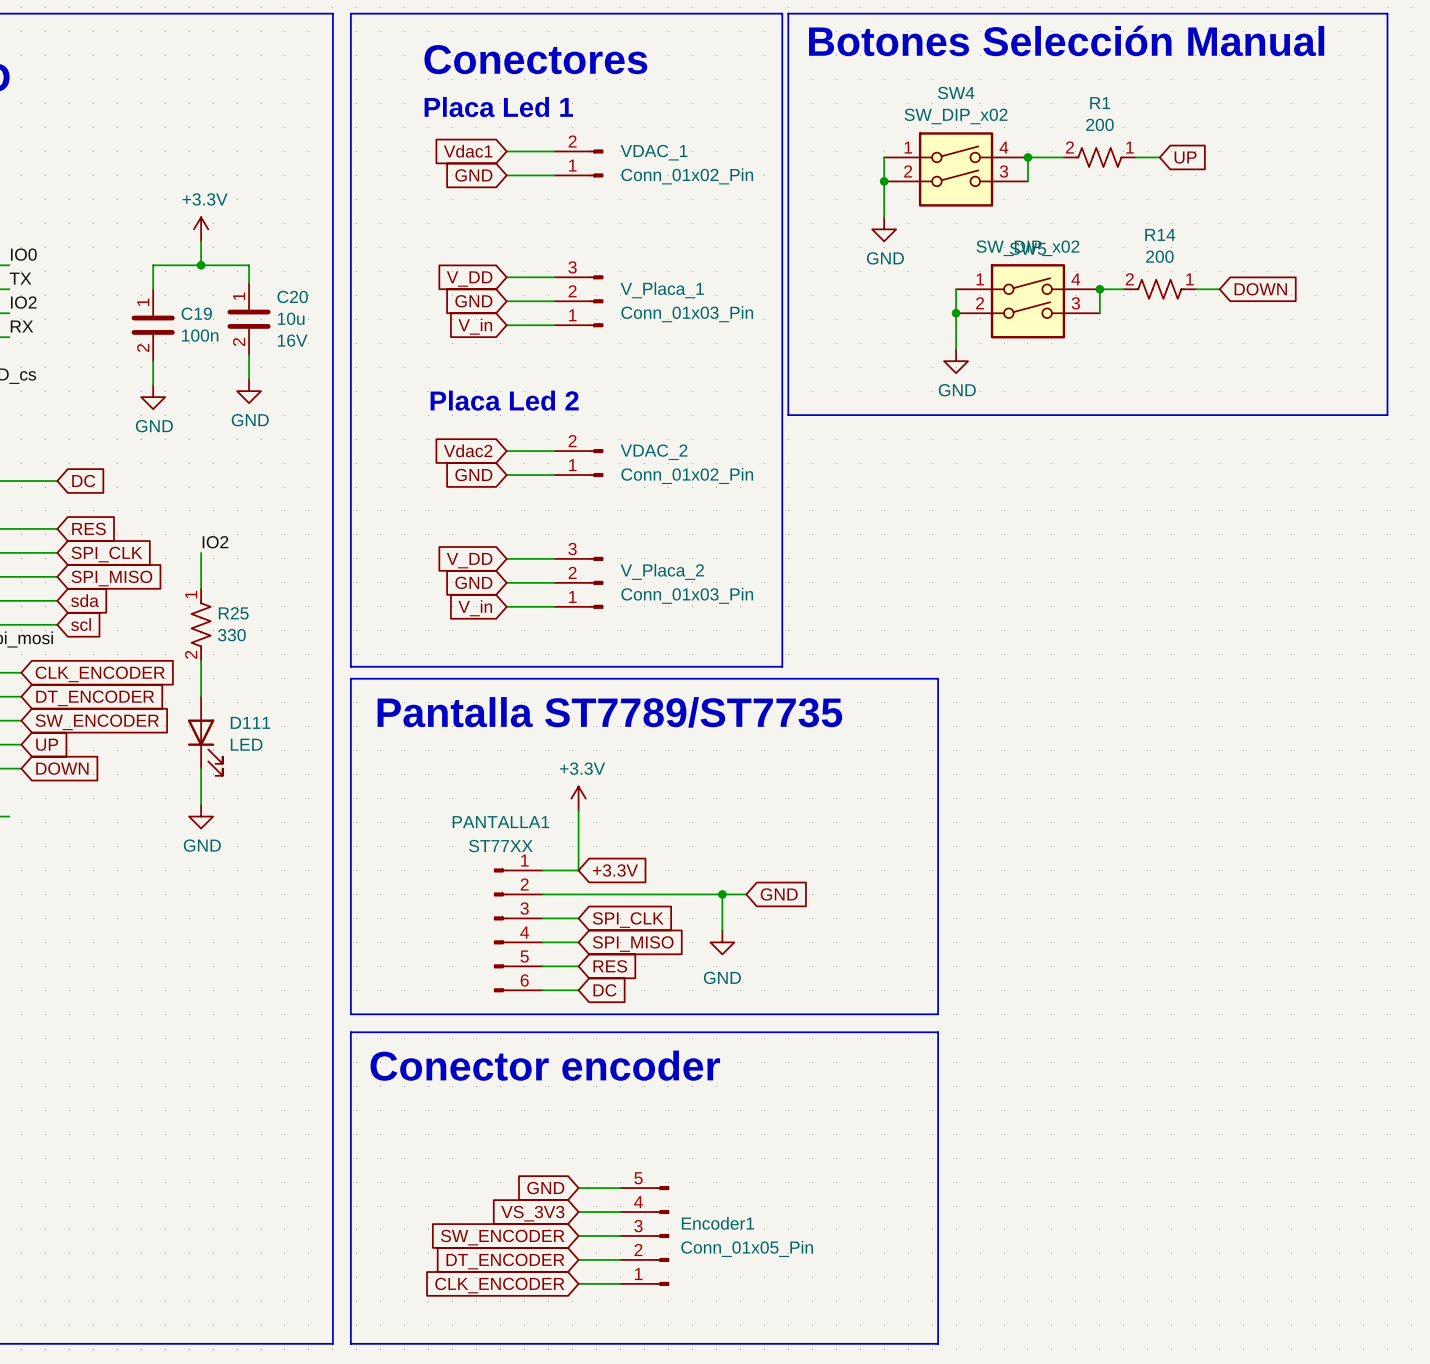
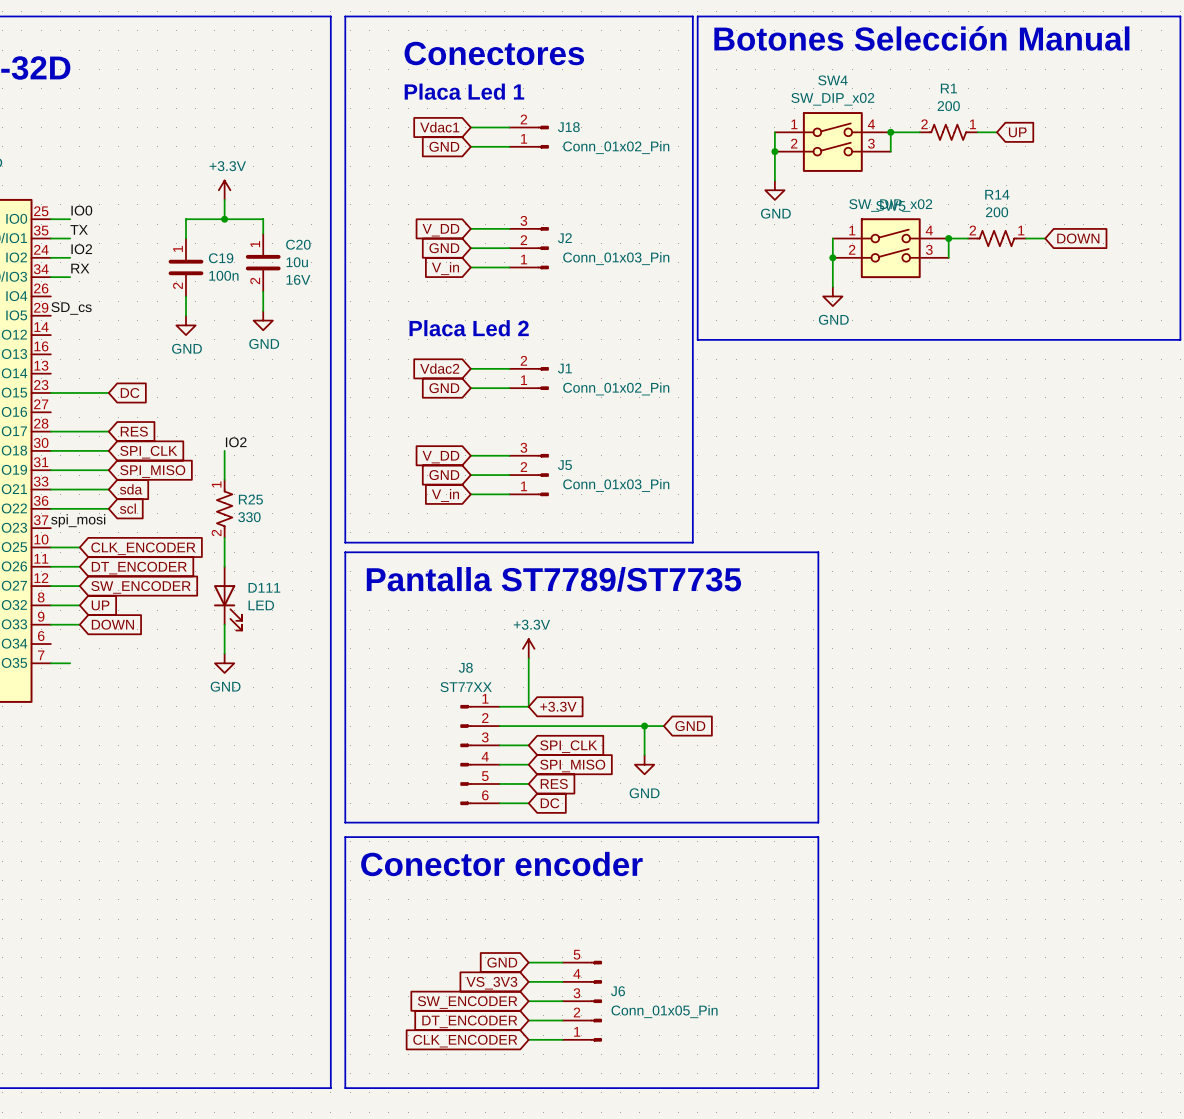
VDAC_1 name: VDAC_1 (654, 152) -> J18 (568, 127)
V_Placa_1 name: V_Placa_1 (662, 290) -> J2 (564, 238)
VDAC_2 name: VDAC_2 (654, 452) -> J1 (564, 368)
V_Placa_2 name: V_Placa_2 (662, 571) -> J5 (564, 465)
PANTALLA1 name: PANTALLA1 (500, 822) -> J8 (465, 667)
Encoder1 name: Encoder1 (718, 1223) -> J6 (618, 991)

